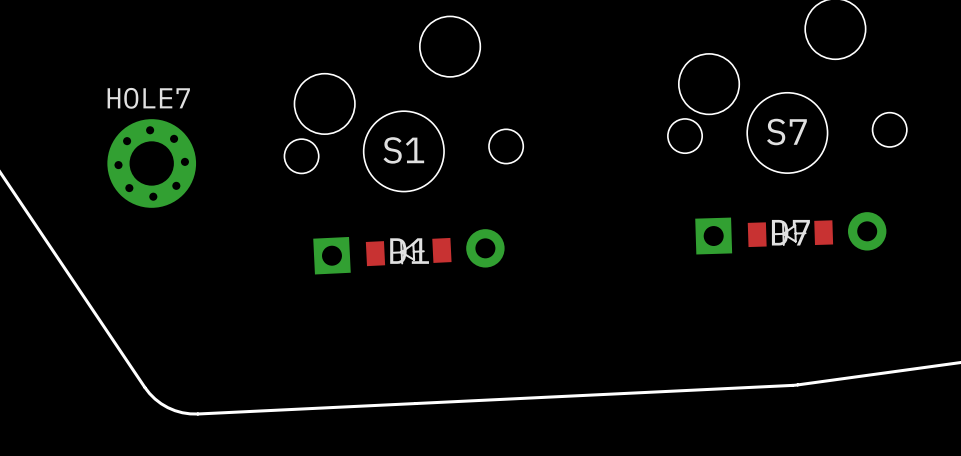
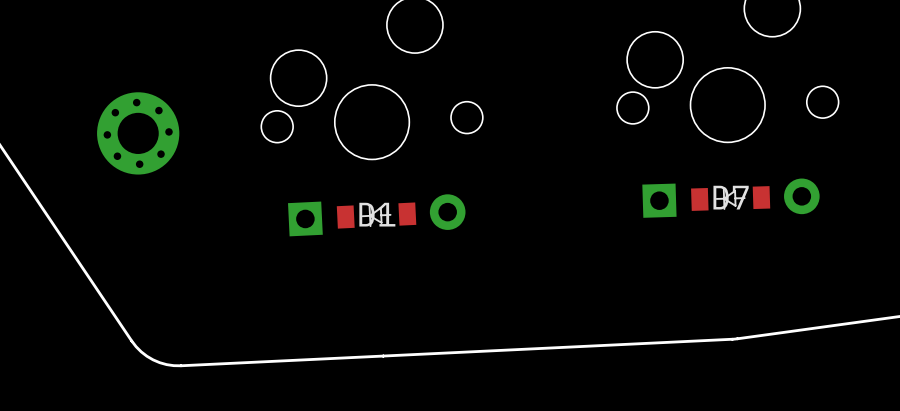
HOLE7 name: HOLE7 (148, 98) -> none
S7 name: S7 (786, 131) -> none
S1 name: S1 (403, 150) -> none

